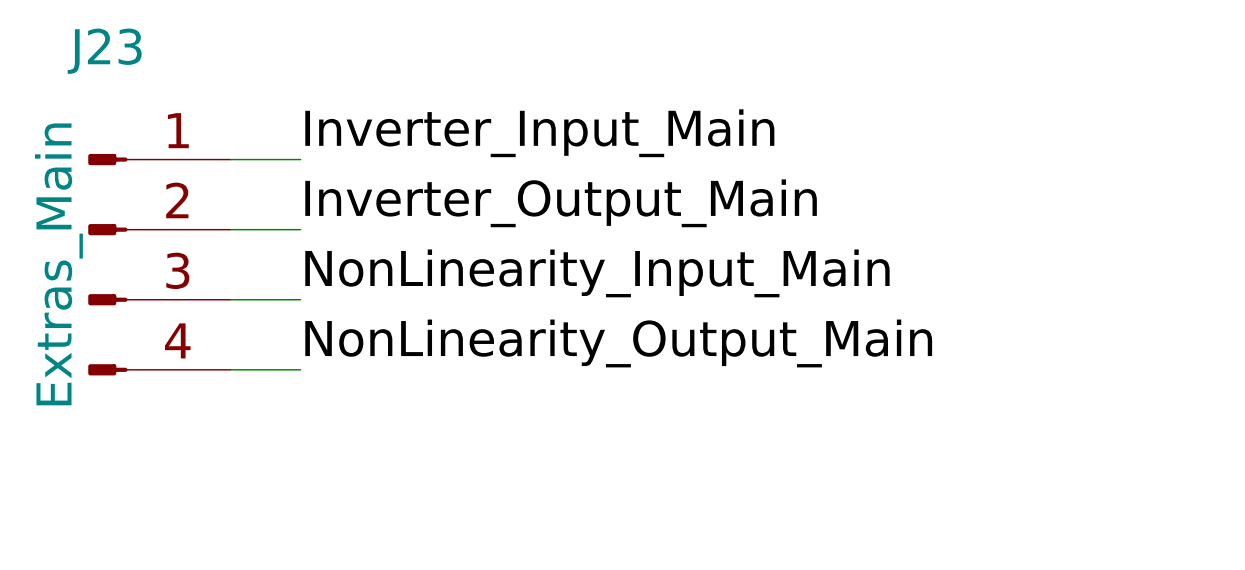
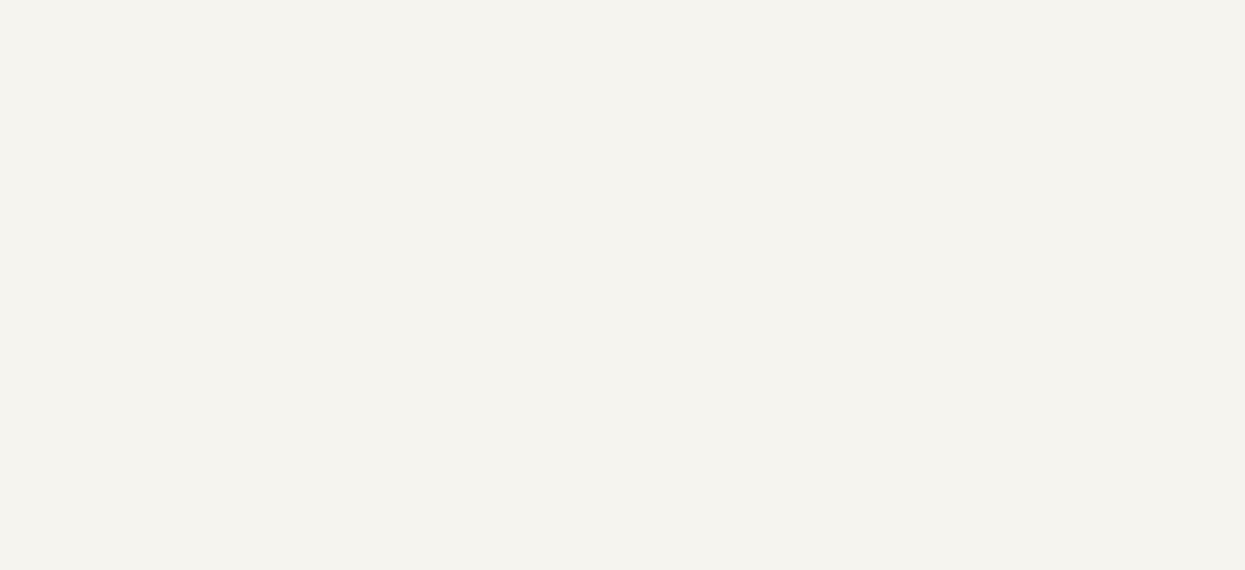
label: Inverter_Input_Main (539, 133) -> none
wire: (230, 159) (300, 159) -> none
label: Inverter_Output_Main (561, 203) -> none
wire: (230, 229) (300, 229) -> none
J23: Extras_Main (159, 264) -> none
label: NonLinearity_Input_Main (597, 273) -> none
wire: (230, 299) (300, 299) -> none
label: NonLinearity_Output_Main (618, 343) -> none
wire: (230, 369) (300, 369) -> none

